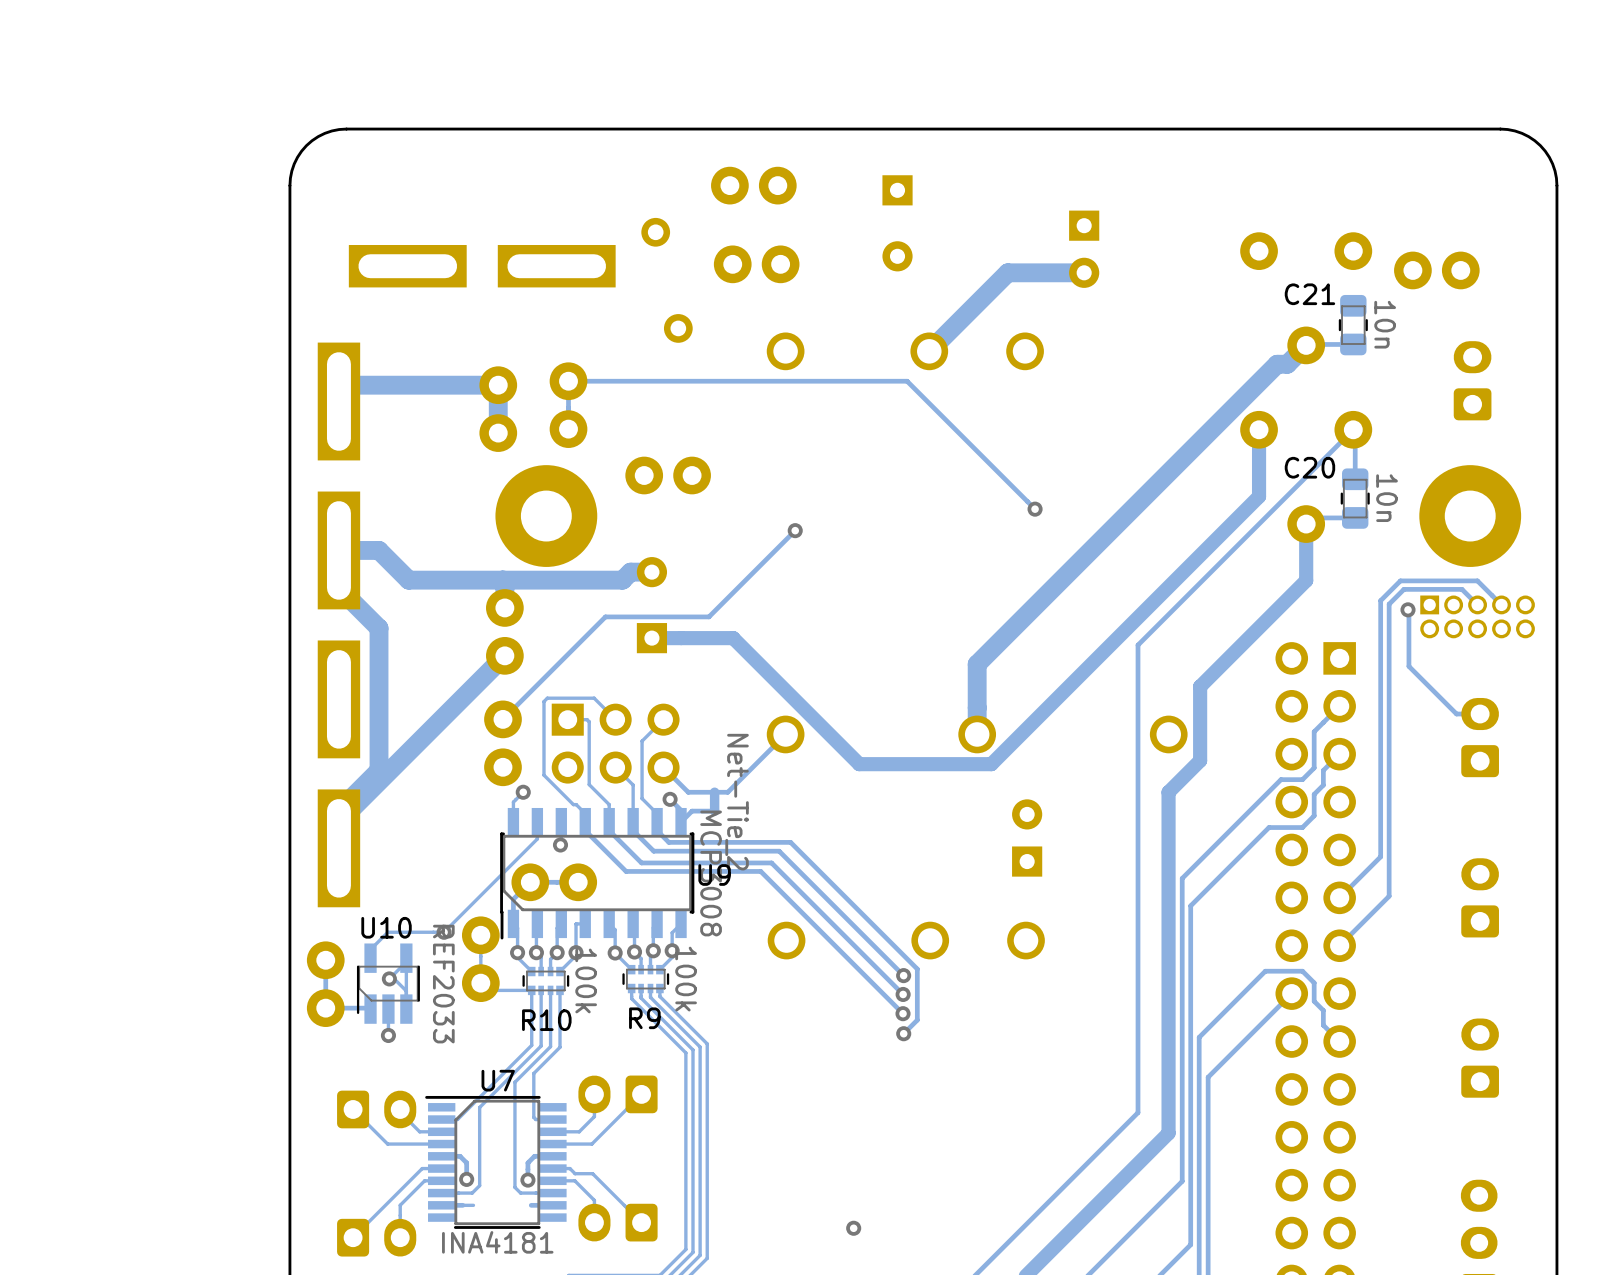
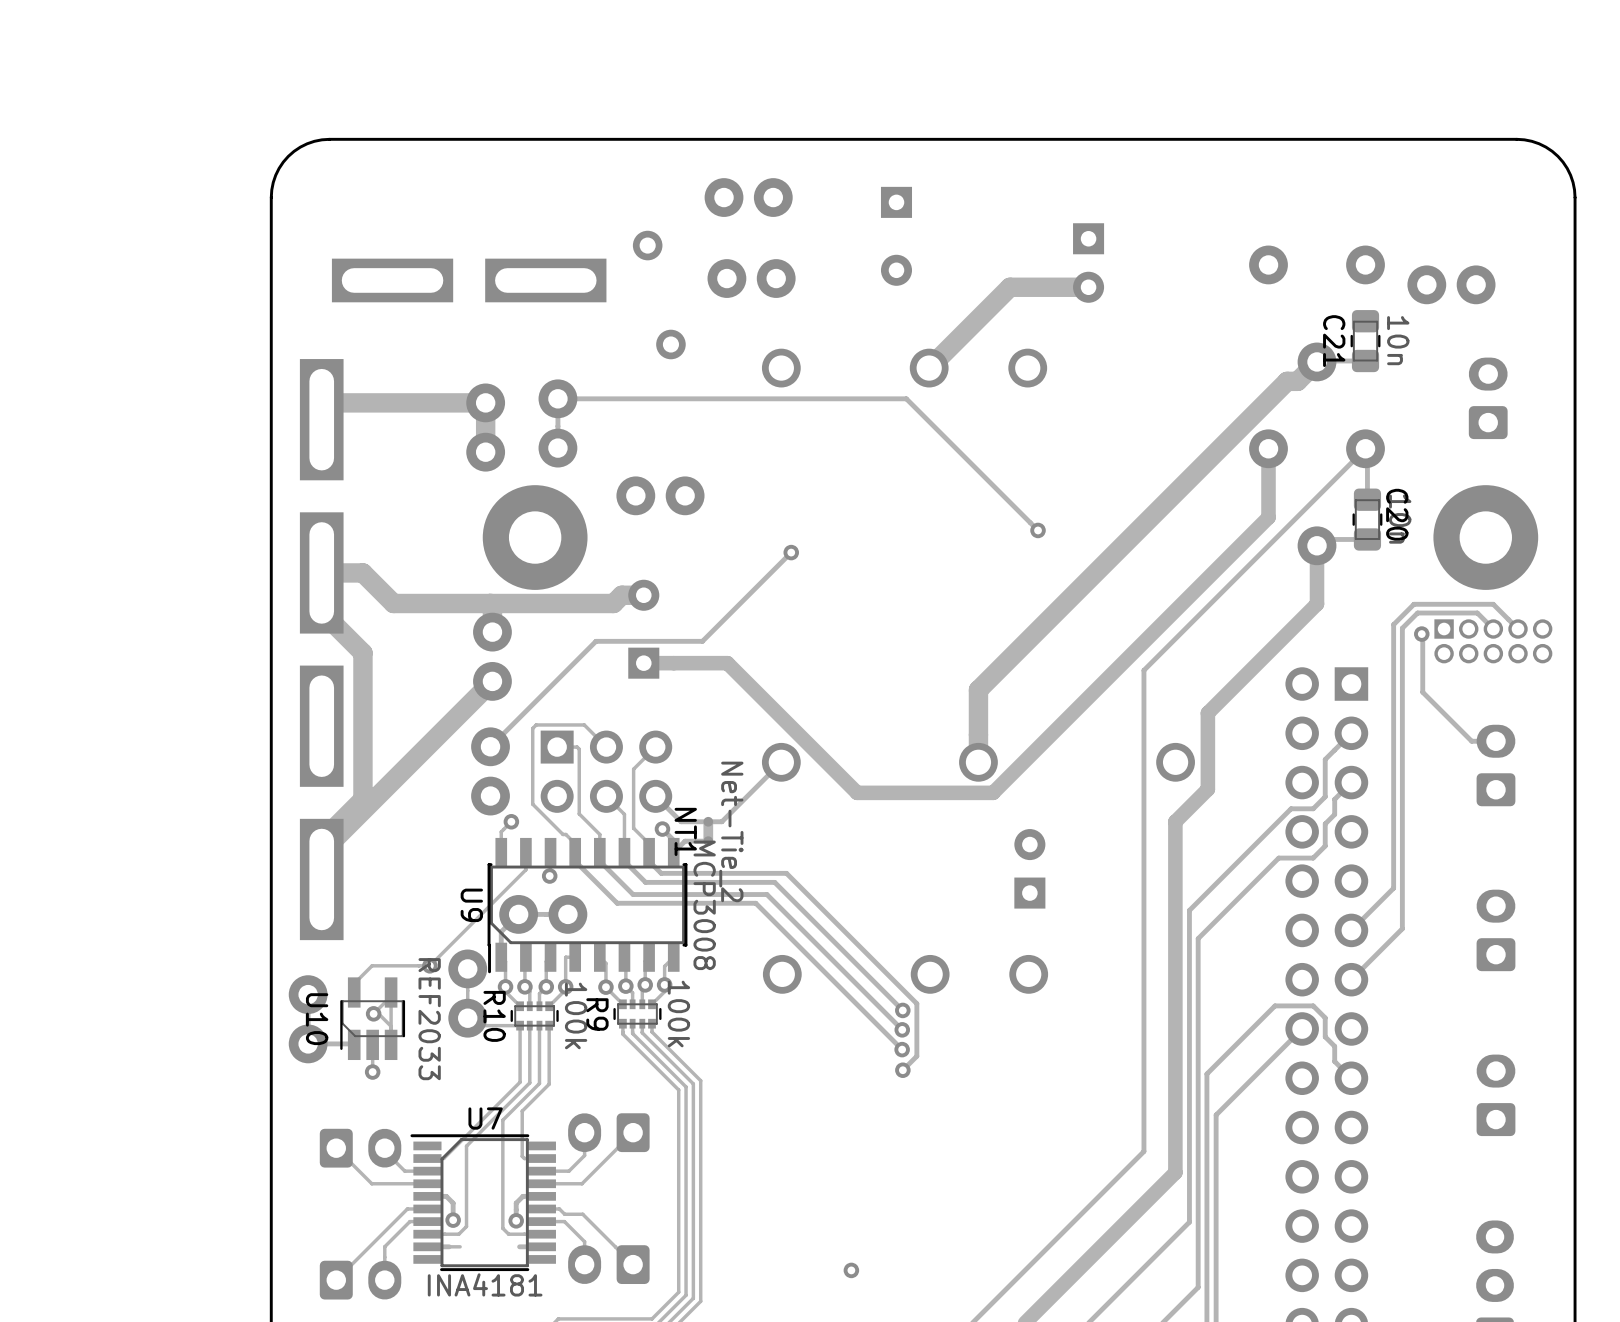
C21 name rotation: 0° (1309, 294) -> 90° clockwise (1334, 341)
C20 name rotation: 0° (1309, 467) -> 90° clockwise (1397, 514)
C20 name position: C20 (1309, 467) -> C20 (1397, 514)
NT1 name: none -> NT1 (685, 831)
U9 name rotation: 0° (714, 874) -> 90° clockwise (471, 905)
U9 name position: U9 (714, 874) -> U9 (471, 905)
U10 name rotation: 0° (386, 927) -> 90° clockwise (317, 1019)
U10 name position: U10 (386, 927) -> U10 (317, 1019)
R9 name rotation: 0° (644, 1018) -> 90° clockwise (597, 1014)
R9 name position: R9 (644, 1018) -> R9 (597, 1014)
R10 name rotation: 0° (546, 1020) -> 90° clockwise (494, 1016)

